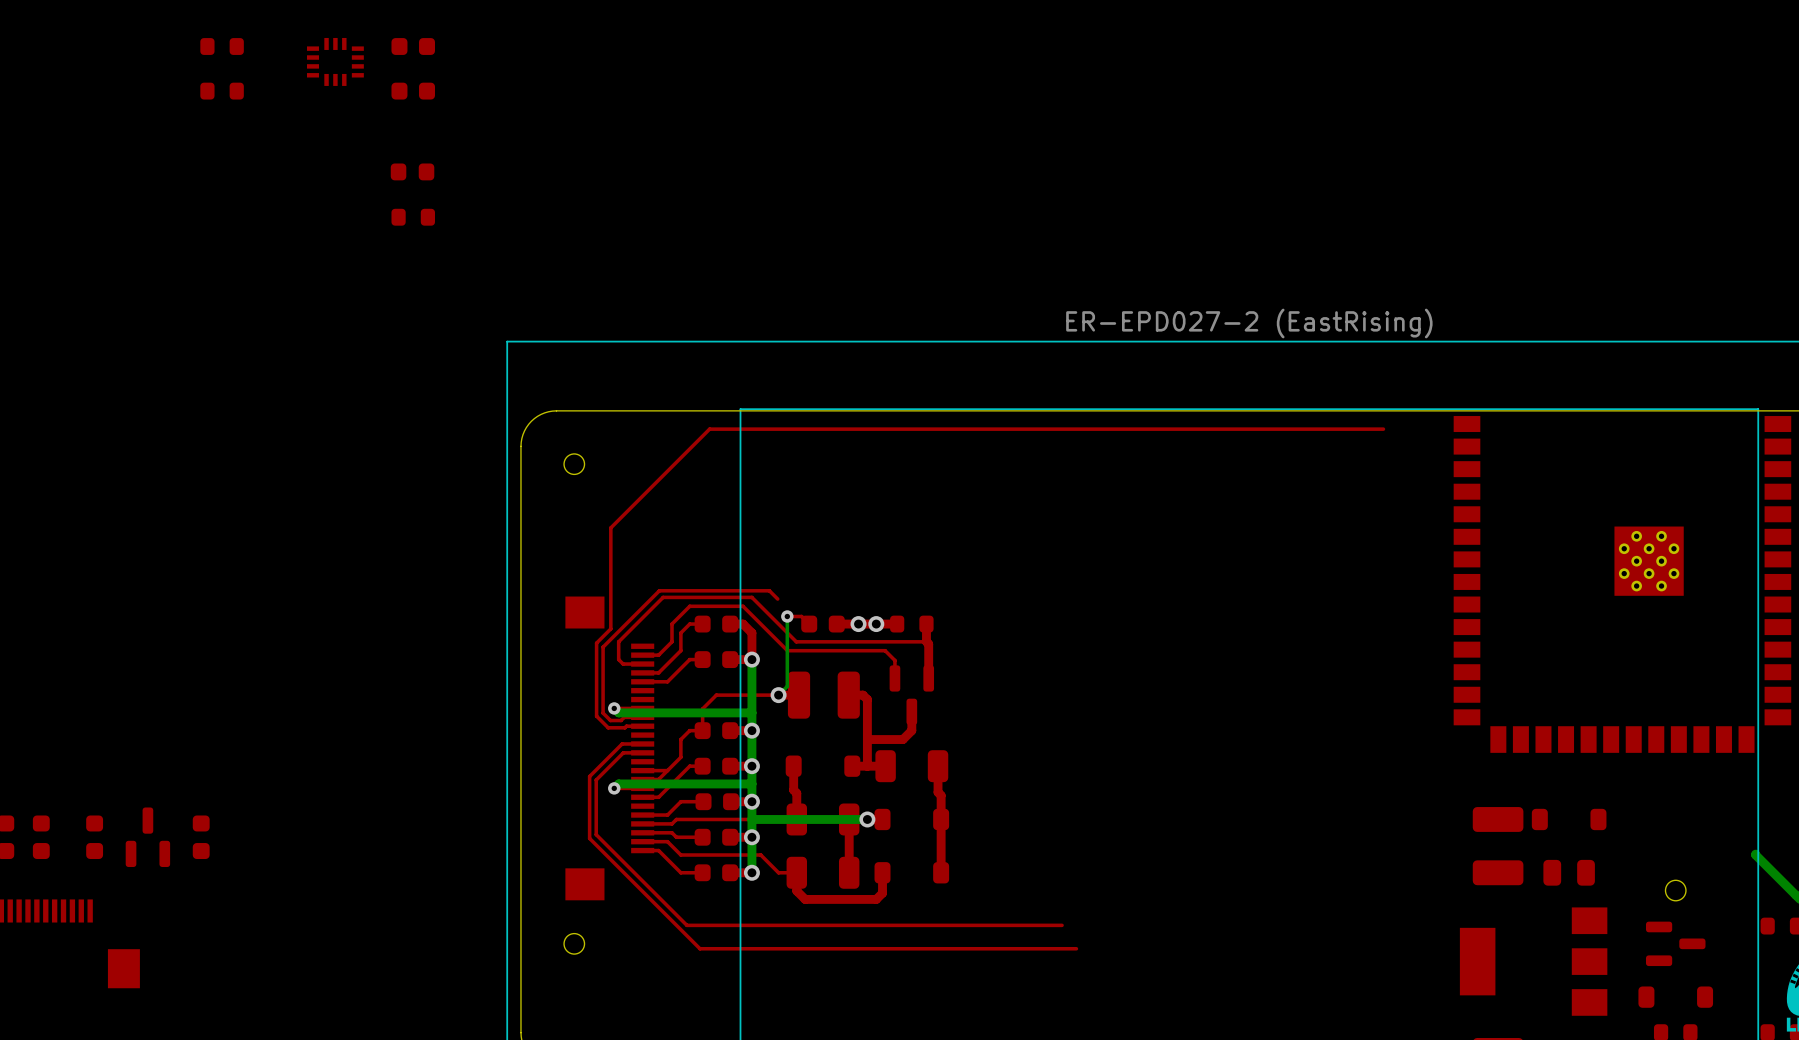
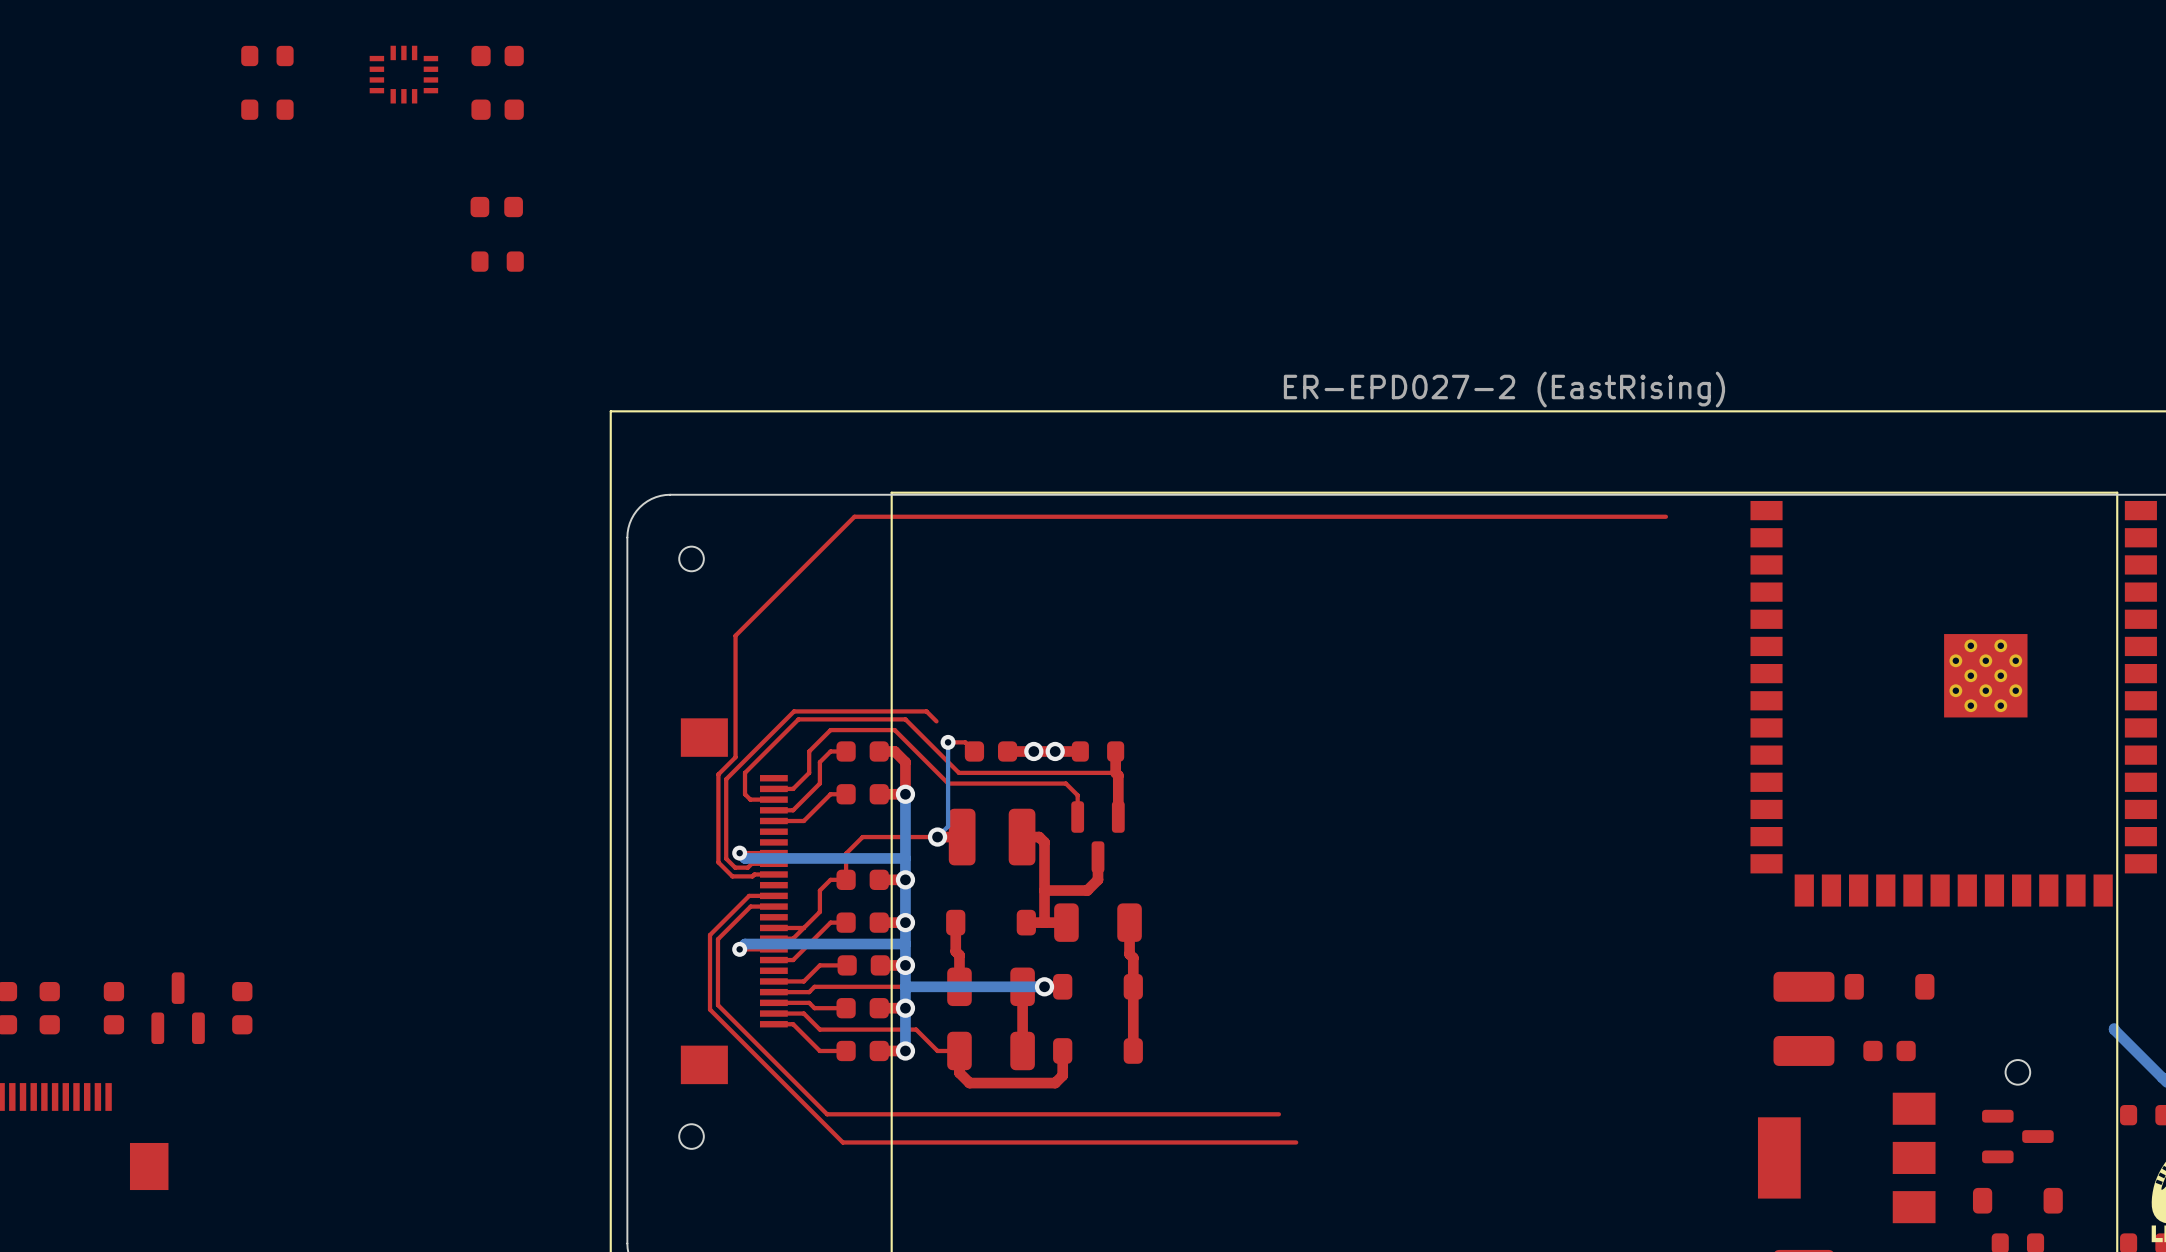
part footprint: [1543, 859, 1595, 886] -> [1863, 1040, 1916, 1062]

